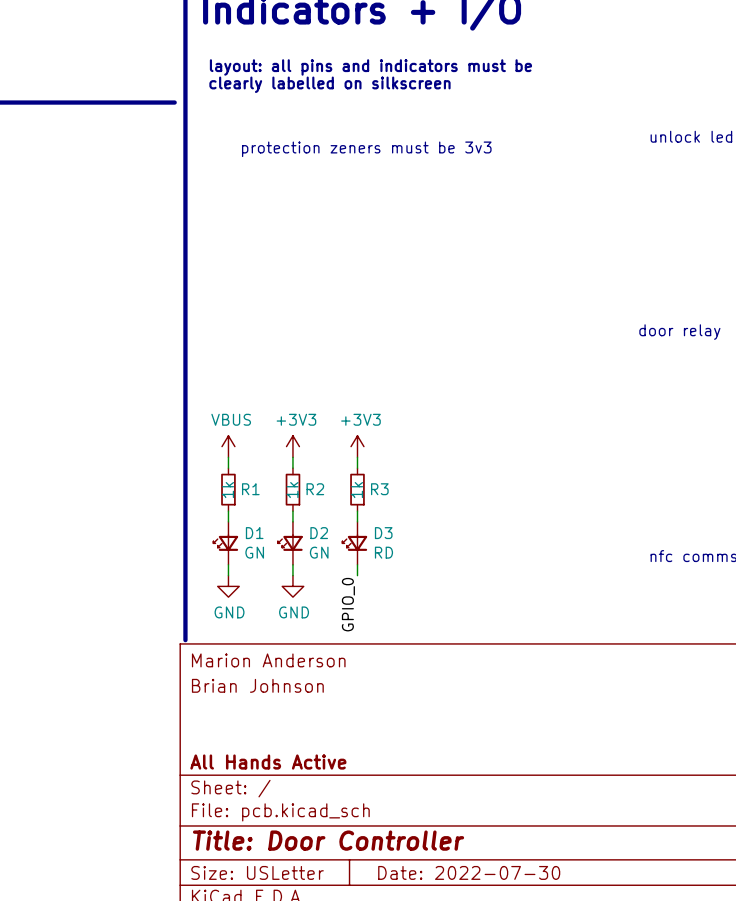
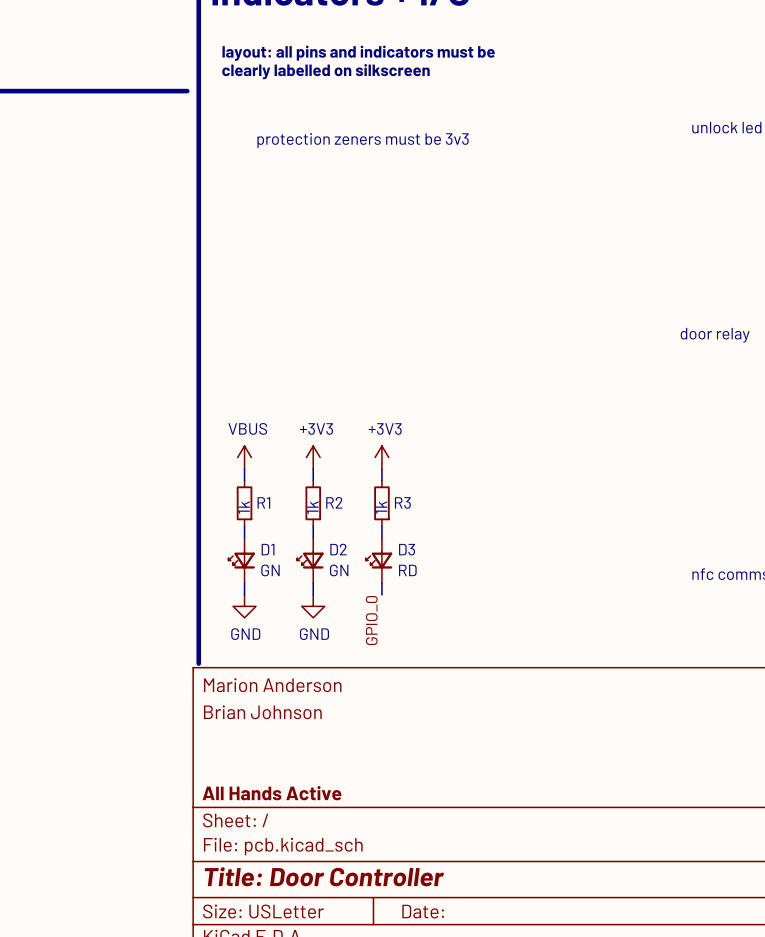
title block: Date: 2022-07-30 (469, 872) -> Date: (423, 911)

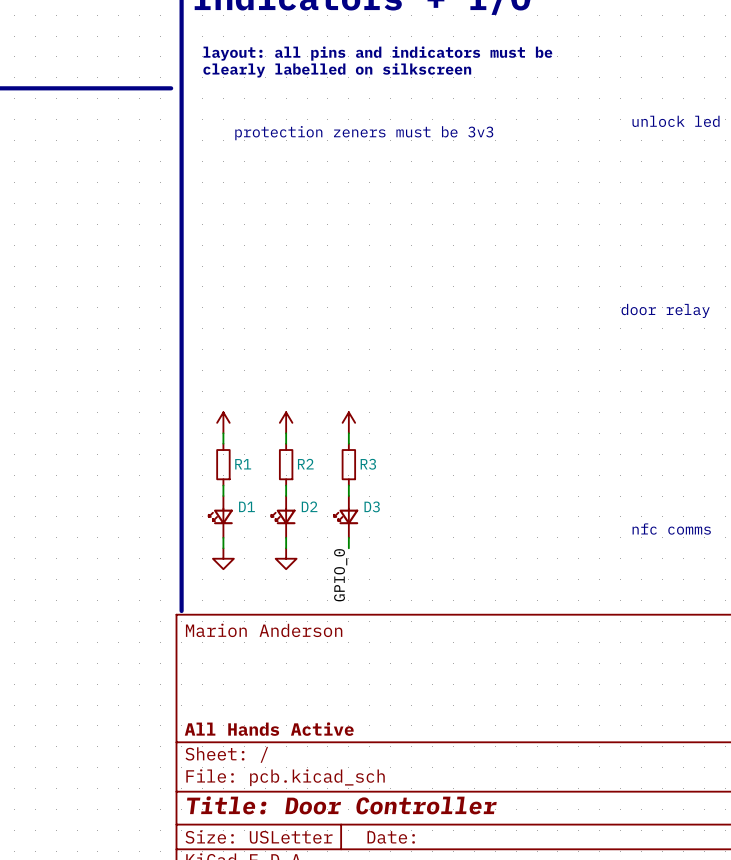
power symbol text: VBUS (247, 428) -> none
power symbol text: +3V3 (316, 428) -> none
power symbol text: +3V3 (385, 428) -> none
R1 value: 1k (244, 507) -> none
R2 value: 1k (312, 507) -> none
R3 value: 1k (381, 507) -> none
D1 value: GN (270, 570) -> none
D2 value: GN (339, 570) -> none
D3 value: RD (407, 570) -> none
power symbol text: GND (245, 634) -> none
power symbol text: GND (314, 634) -> none
title block: Brian Johnson (262, 712) -> none

